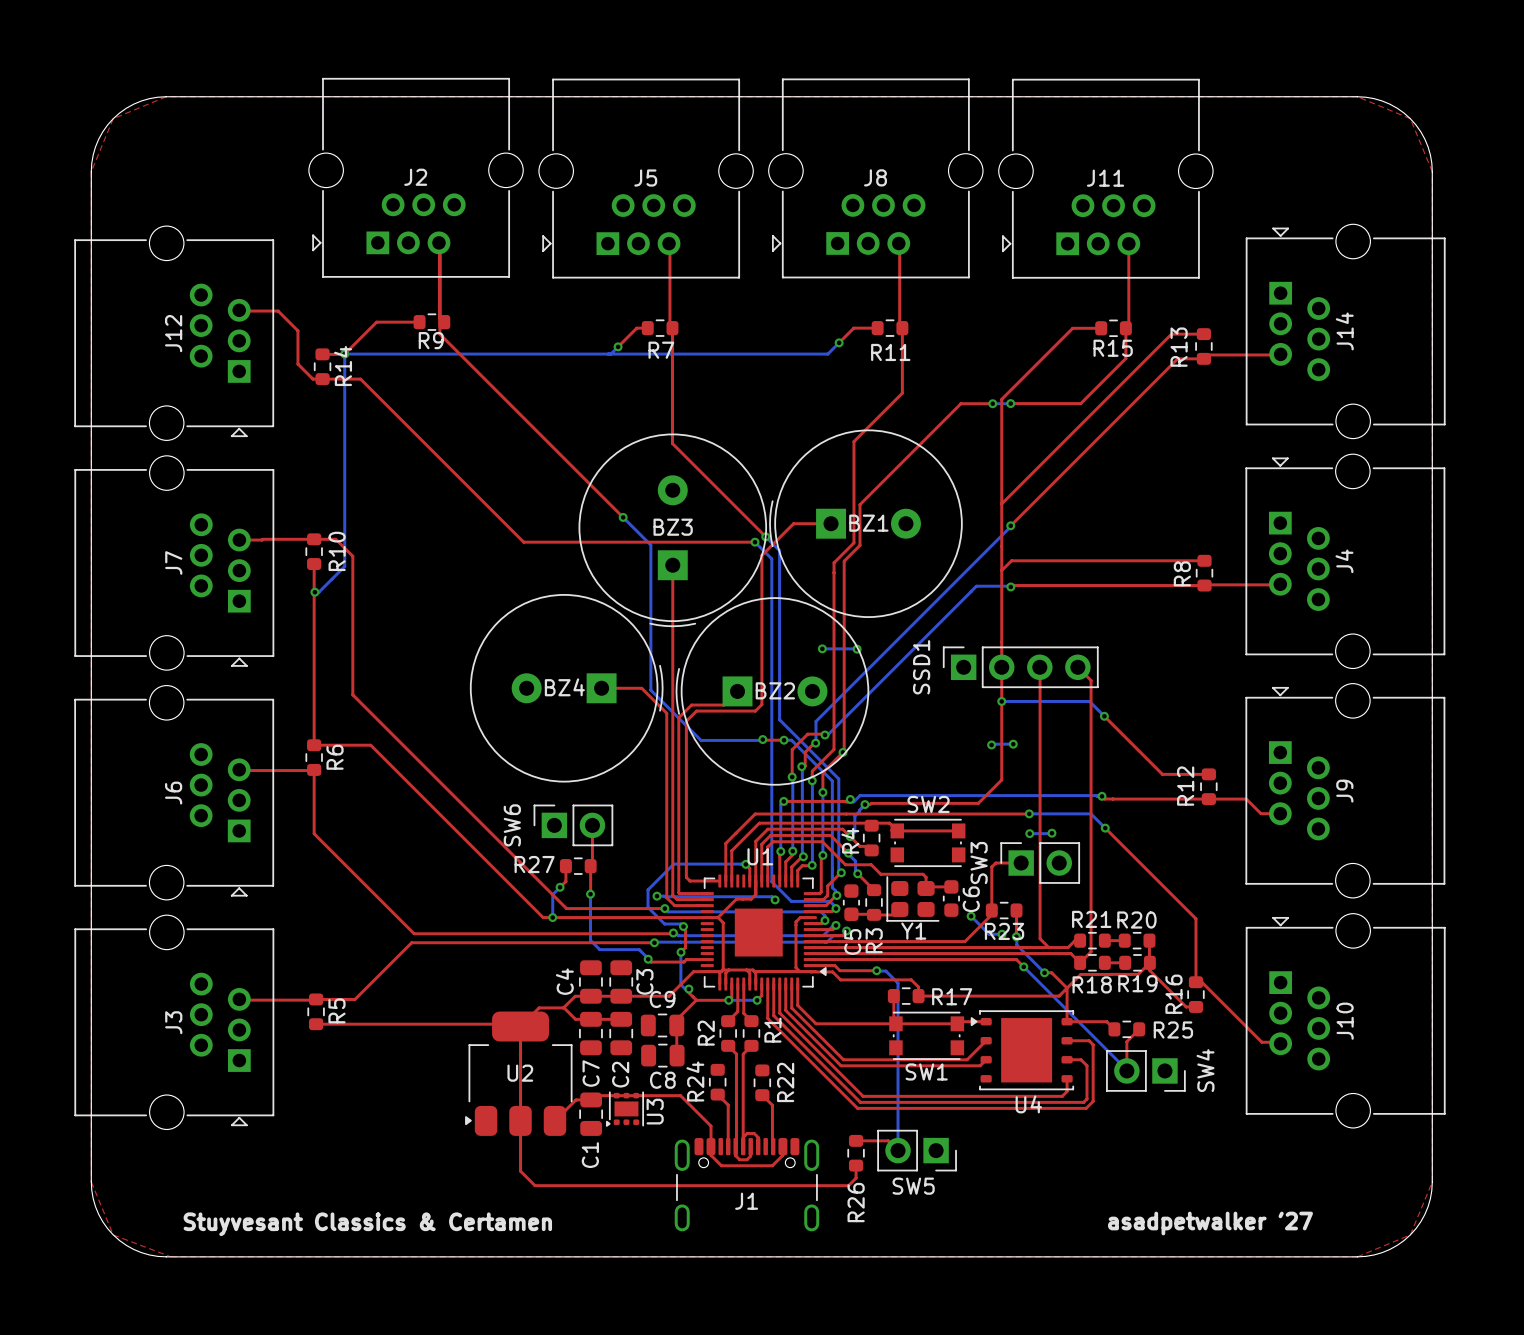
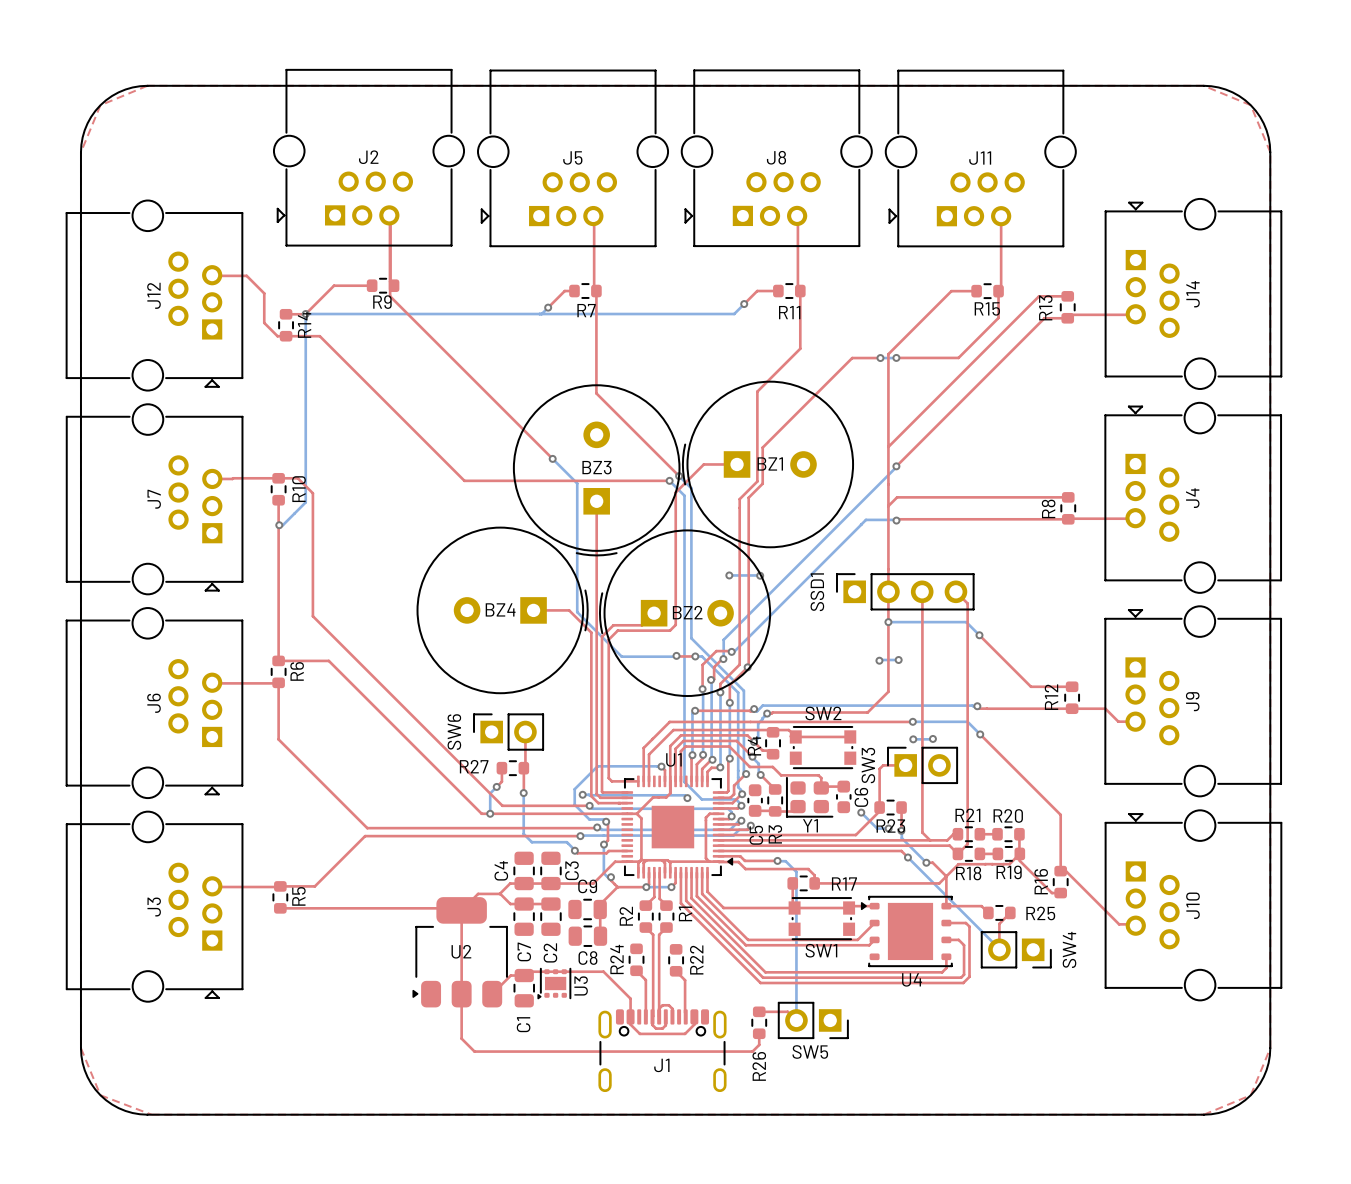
text: asadpetwalker '27 (1210, 1223) -> none
text: Stuyvesant Classics & Certamen (367, 1224) -> none

